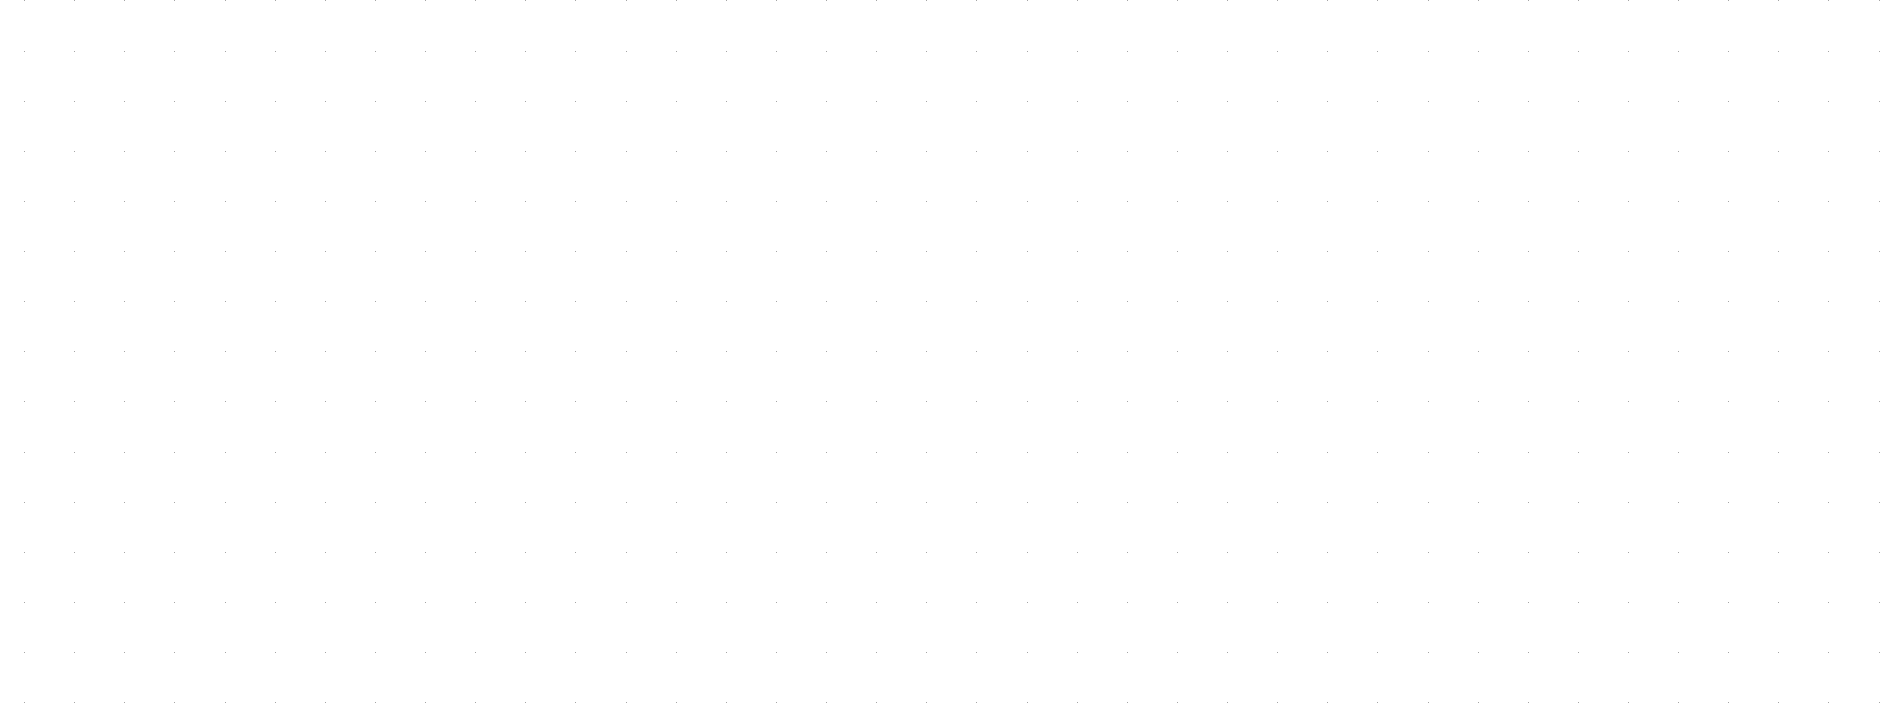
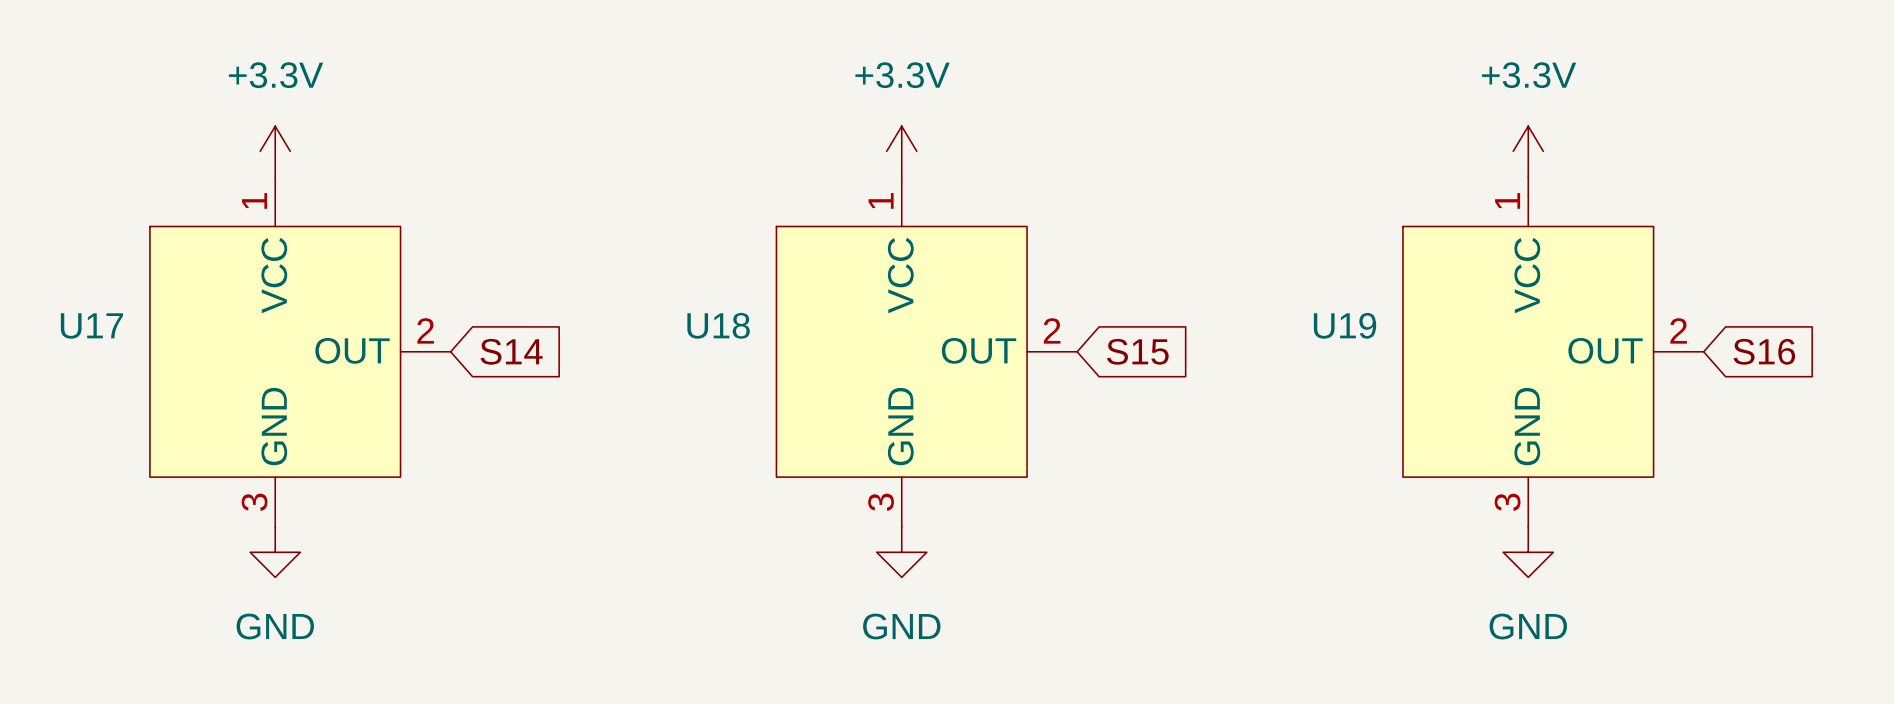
power symbol: none -> +3.3V (275, 151)
power symbol: none -> +3.3V (901, 151)
power symbol: none -> +3.3V (1528, 151)
U17: none -> (300, 351)
global label: none -> S14 (511, 351)
U18: none -> (926, 351)
global label: none -> S15 (1137, 351)
U19: none -> (1553, 351)
global label: none -> S16 (1764, 351)
power symbol: none -> GND (275, 552)
power symbol: none -> GND (901, 552)
power symbol: none -> GND (1528, 552)

